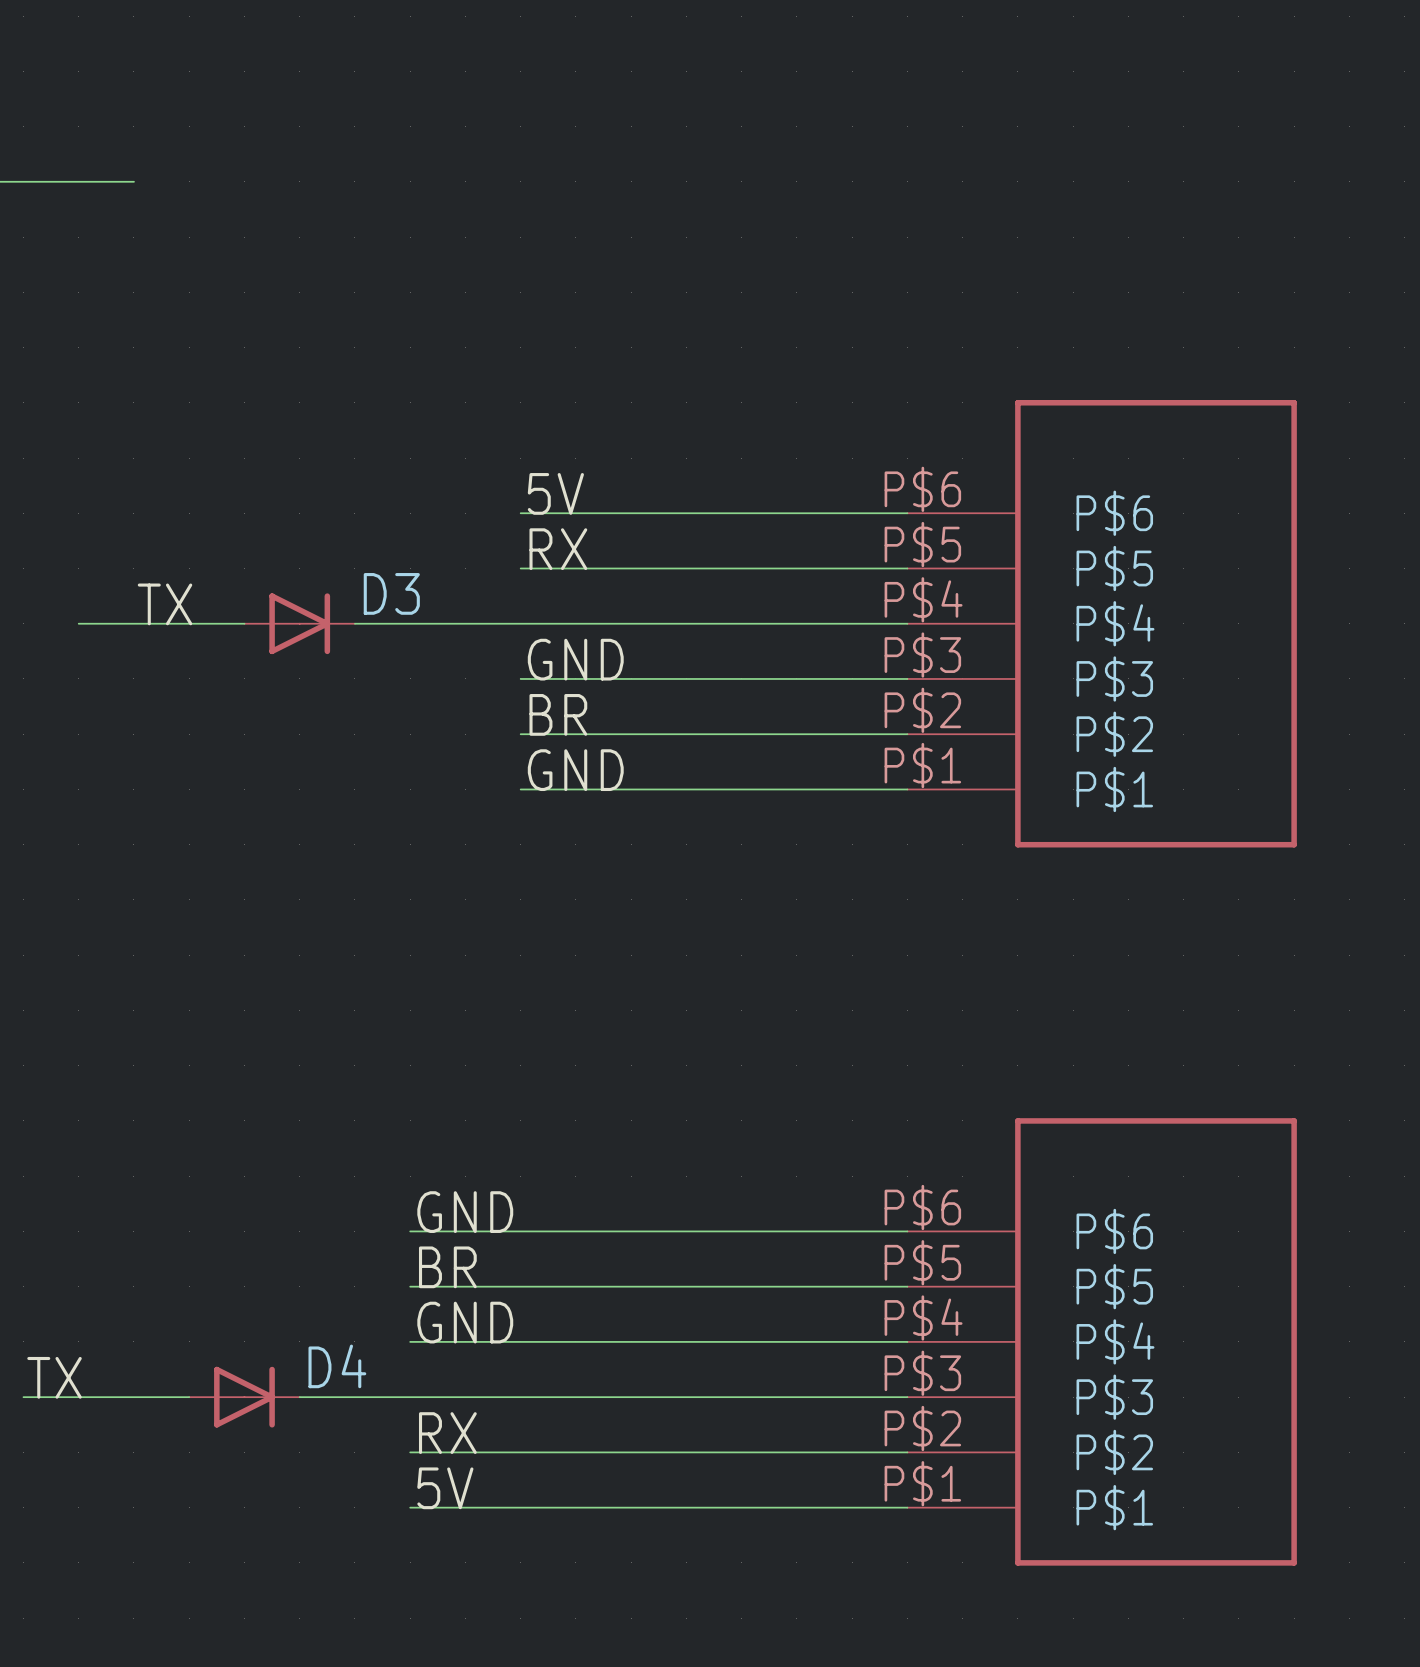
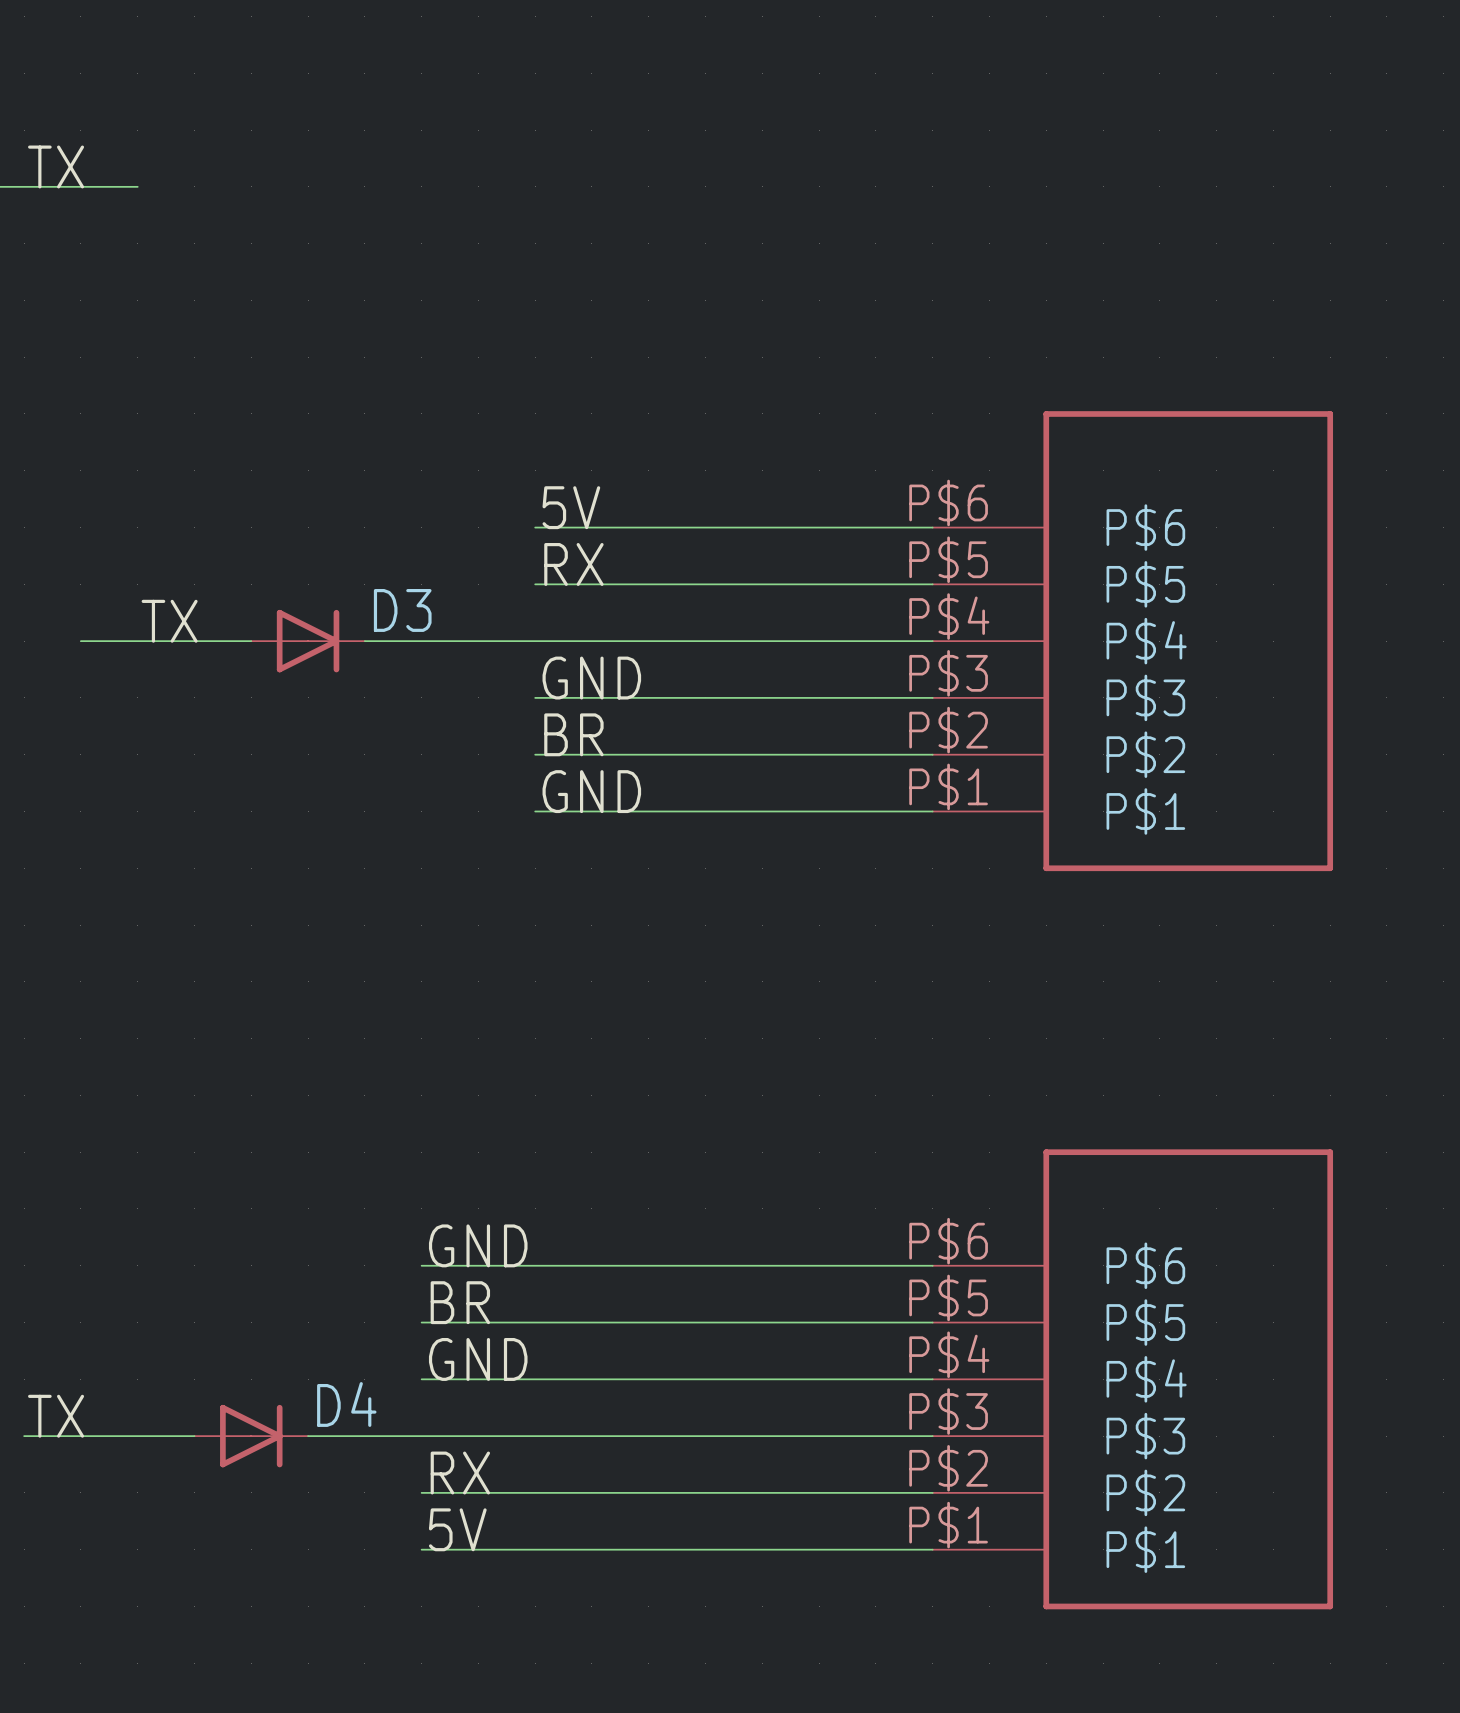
label: none -> TX (56, 166)

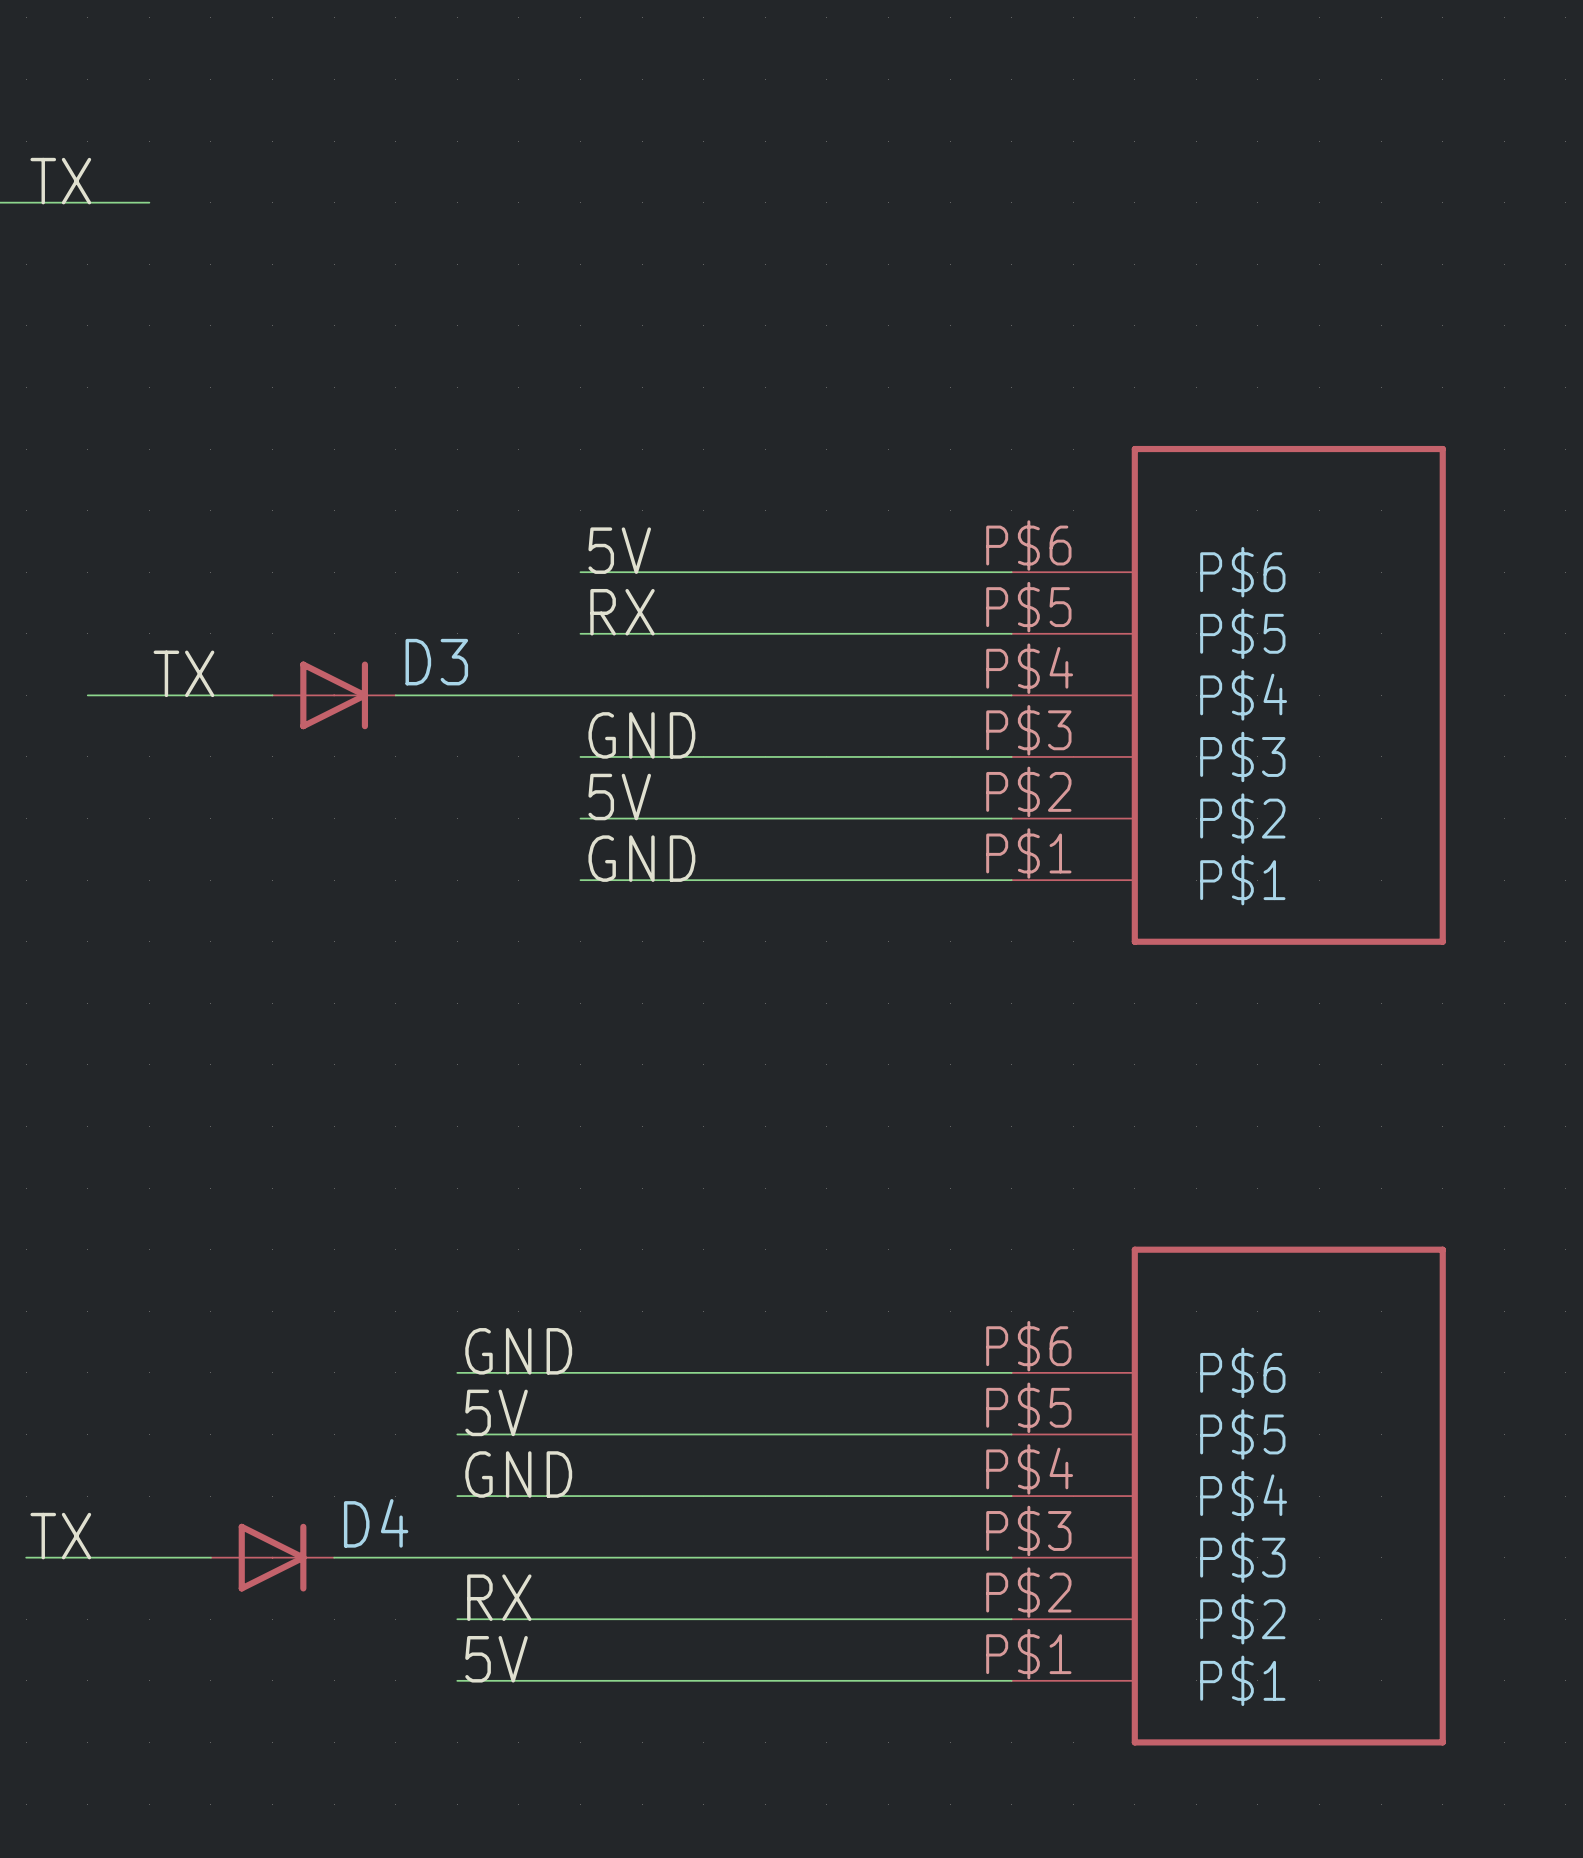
label: BR (573, 734) -> 5V (619, 797)
label: BR (460, 1302) -> 5V (496, 1412)

